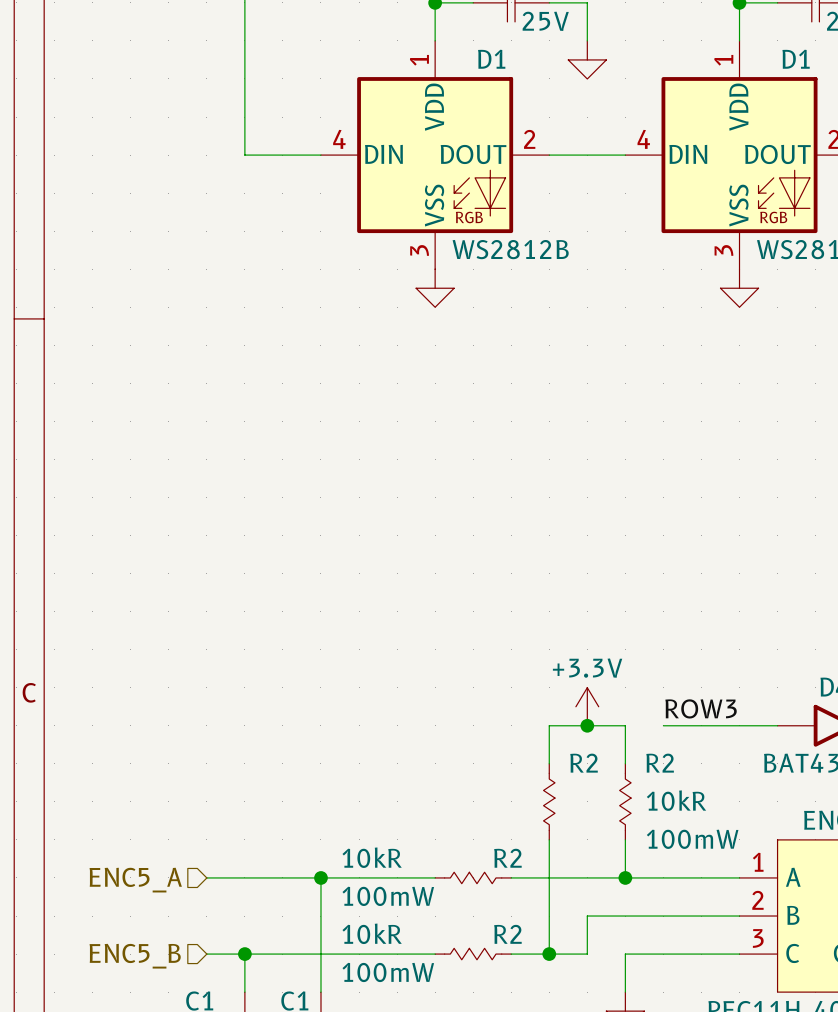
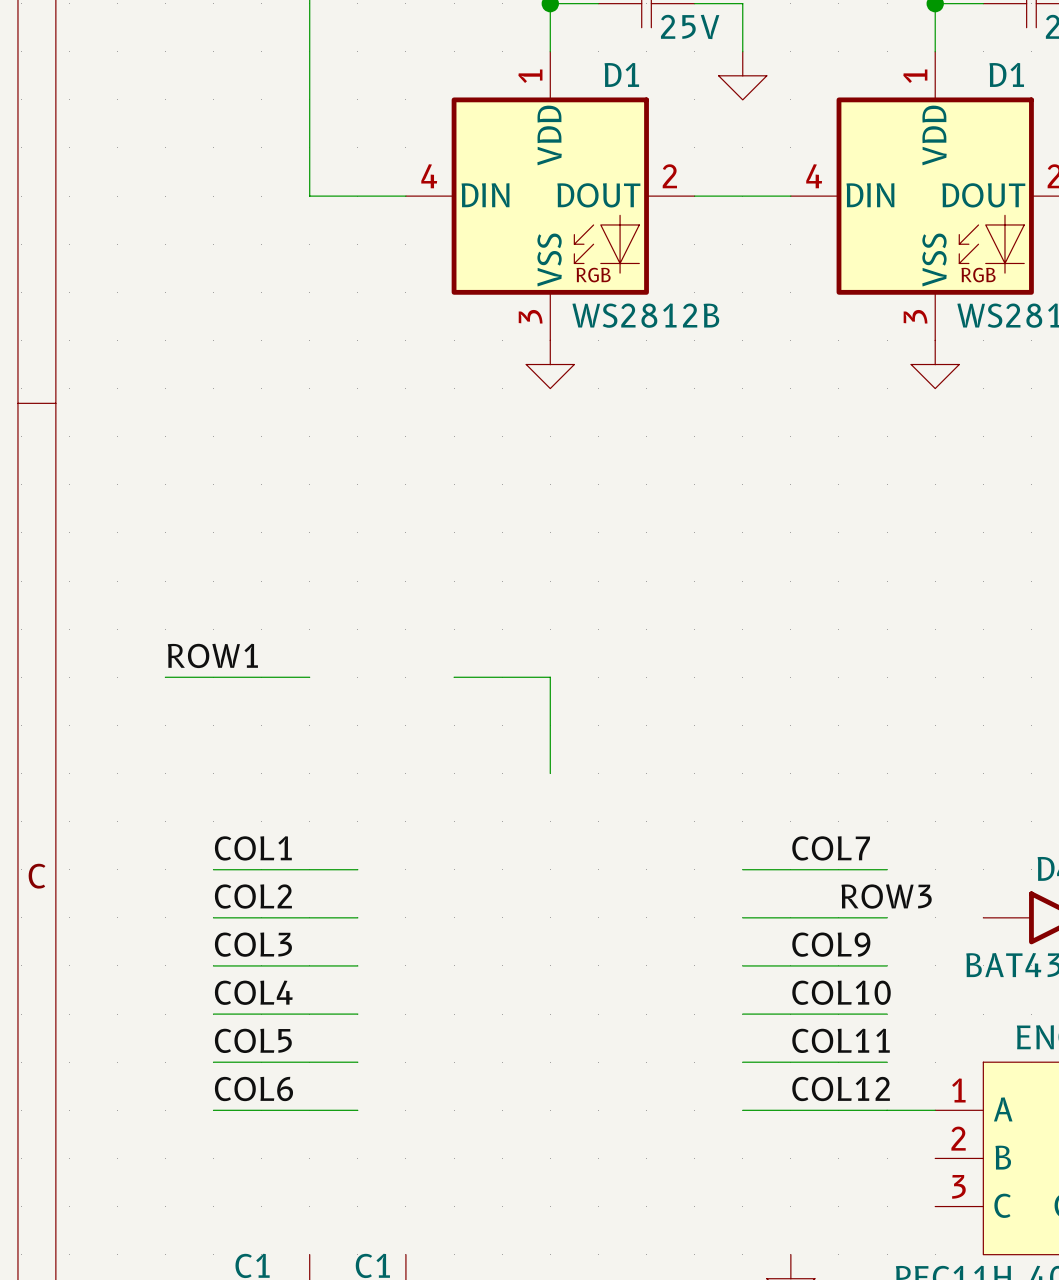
label: none -> ROW1 (212, 655)
wire: none -> (165, 677) (309, 677)
wire: none -> (454, 677) (550, 677) (550, 773)
label: none -> COL1 (253, 848)
label: none -> COL7 (831, 848)
wire: none -> (213, 869) (357, 869)
wire: none -> (742, 869) (887, 869)
power symbol: +3.3V (587, 706) -> none
label: none -> COL2 (253, 896)
wire: none -> (213, 917) (357, 917)
wire: (587, 725) (549, 725) (549, 763) -> none
junction: (587, 725) -> none
wire: (625, 725) (625, 763) -> (790, 917) (838, 917)
wire: (701, 725) (777, 725) -> none
label: none -> COL3 (253, 944)
label: none -> COL9 (831, 944)
wire: none -> (213, 965) (357, 965)
wire: none -> (742, 965) (887, 965)
label: none -> COL4 (253, 992)
label: none -> COL10 (841, 992)
wire: none -> (213, 1014) (357, 1014)
R2: (549, 801) -> none
wire: none -> (742, 1014) (887, 1014)
R2: (625, 801) -> none
label: none -> COL5 (253, 1040)
label: none -> COL11 (841, 1040)
wire: none -> (213, 1062) (357, 1062)
wire: (549, 839) (549, 954) -> none
wire: none -> (742, 1062) (887, 1062)
wire: (625, 839) (625, 877) -> none
label: none -> COL6 (253, 1088)
label: none -> COL12 (841, 1088)
wire: none -> (213, 1110) (261, 1110)
wire: (282, 877) (435, 877) -> none
wire: (320, 877) (320, 992) -> none
junction: (320, 877) -> none
R2: (473, 877) -> none
wire: (511, 877) (587, 877) -> none
junction: (625, 877) -> none
hierarchical label: ENC5_A (135, 880) -> none
wire: (739, 916) (587, 916) (587, 954) (511, 954) -> none
wire: (206, 954) (435, 954) -> none
wire: (244, 954) (244, 992) -> none
junction: (244, 954) -> none
R2: (473, 954) -> none
junction: (549, 954) -> none
wire: (739, 954) (625, 954) (625, 992) -> none
hierarchical label: ENC5_B (135, 956) -> none

